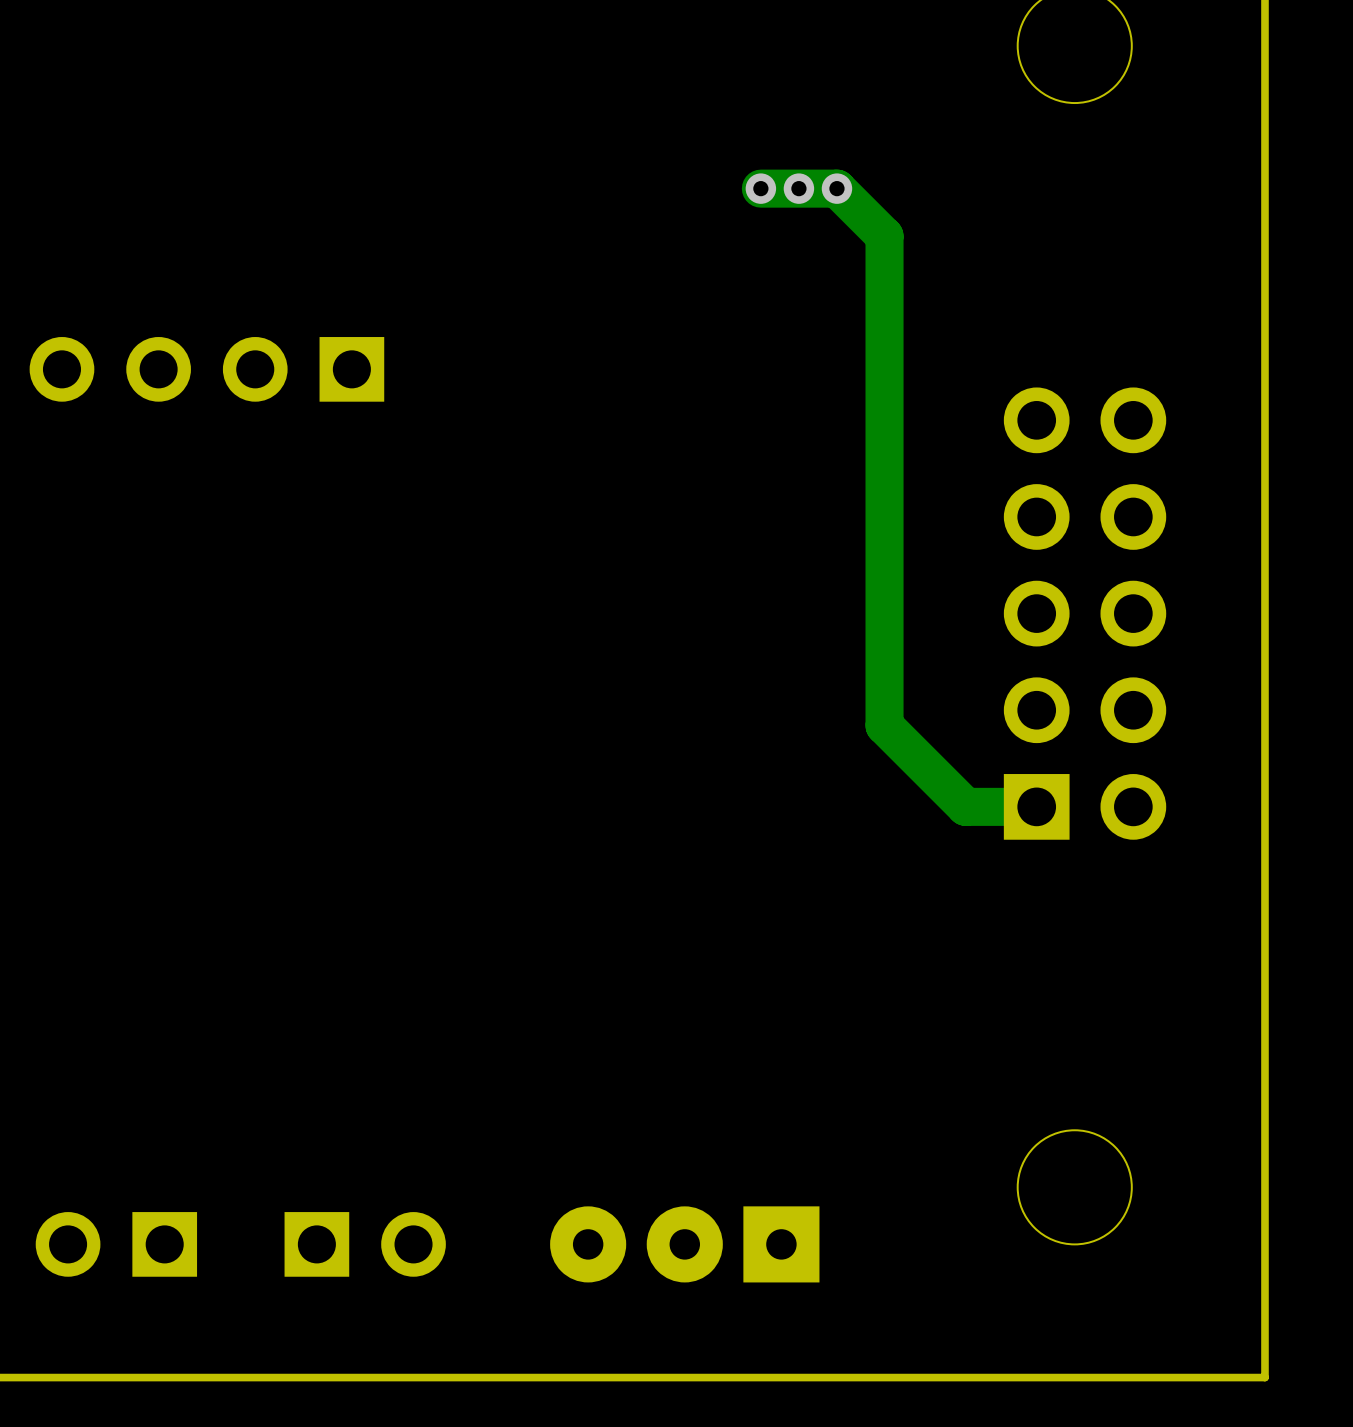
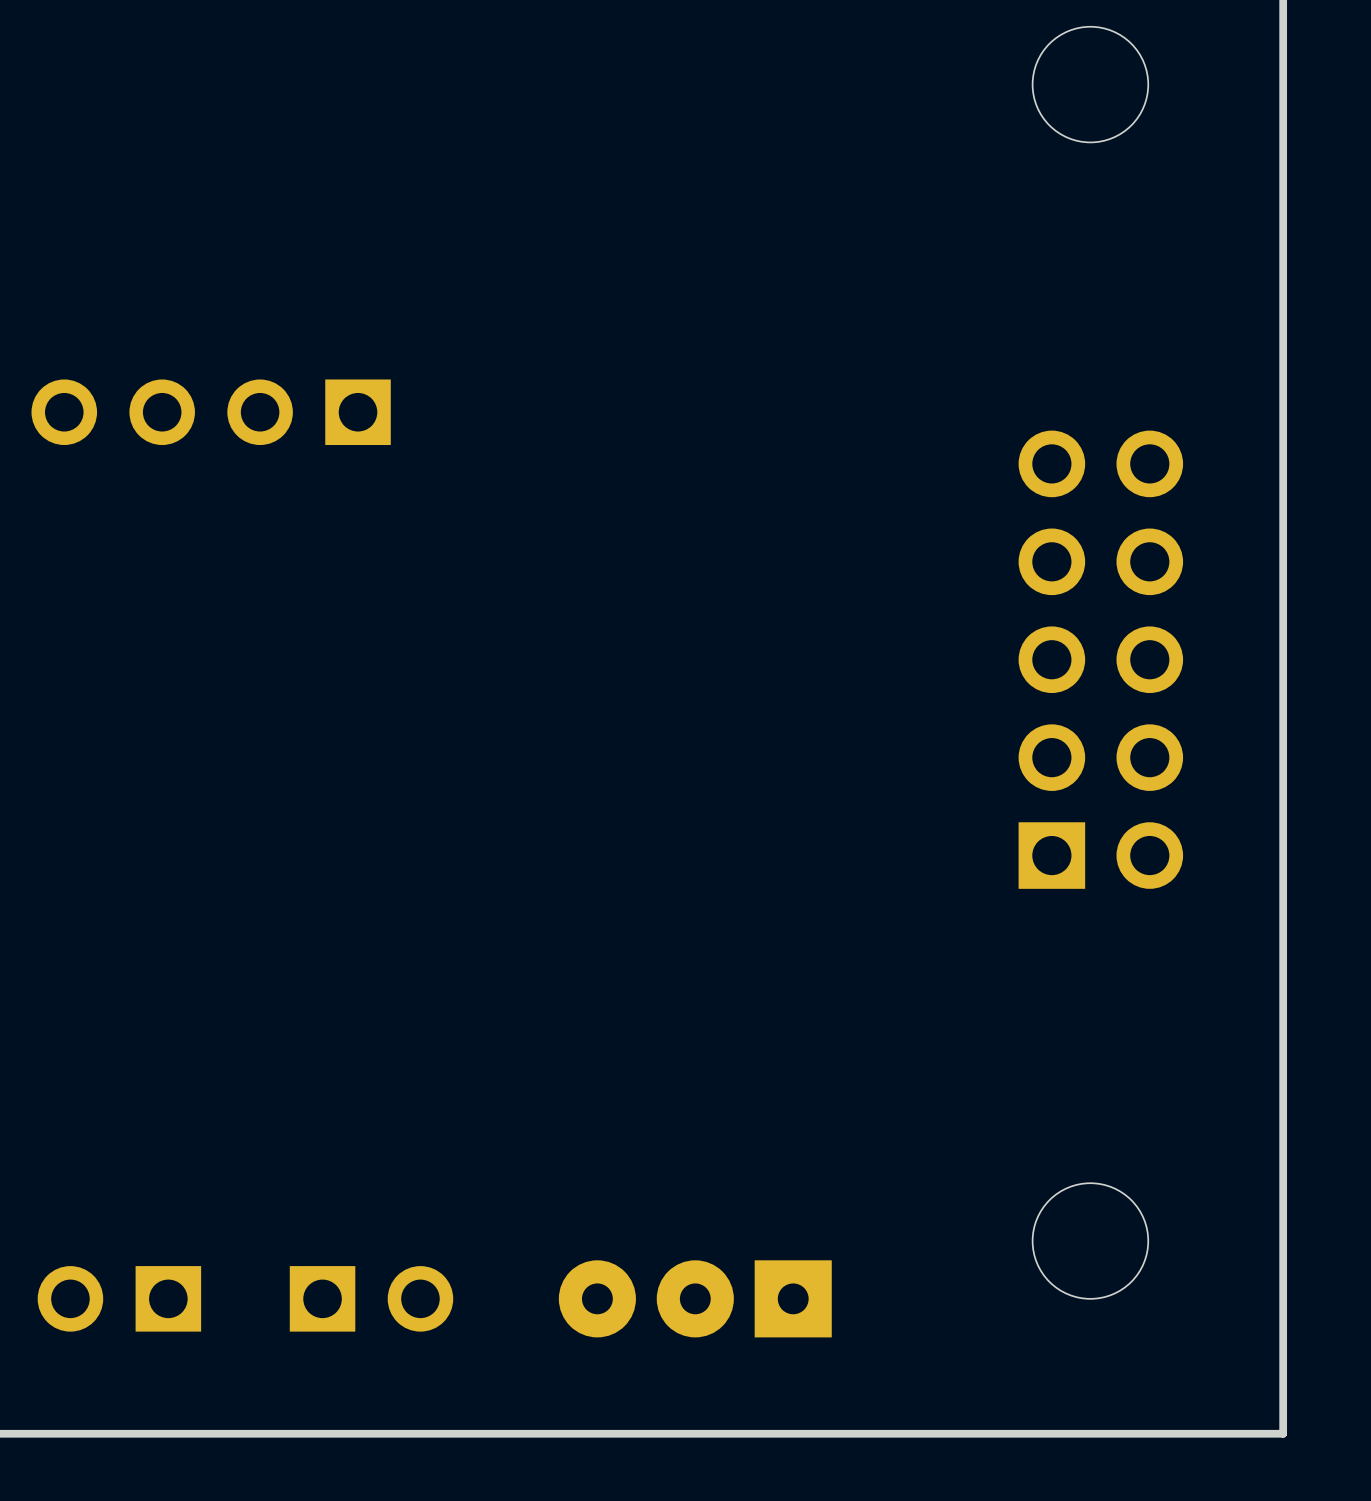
track: (760, 188) (836, 188) (884, 236) (884, 725) (965, 806) (1036, 806) -> none
via: (760, 188) -> none
via: (798, 188) -> none
via: (836, 188) -> none

